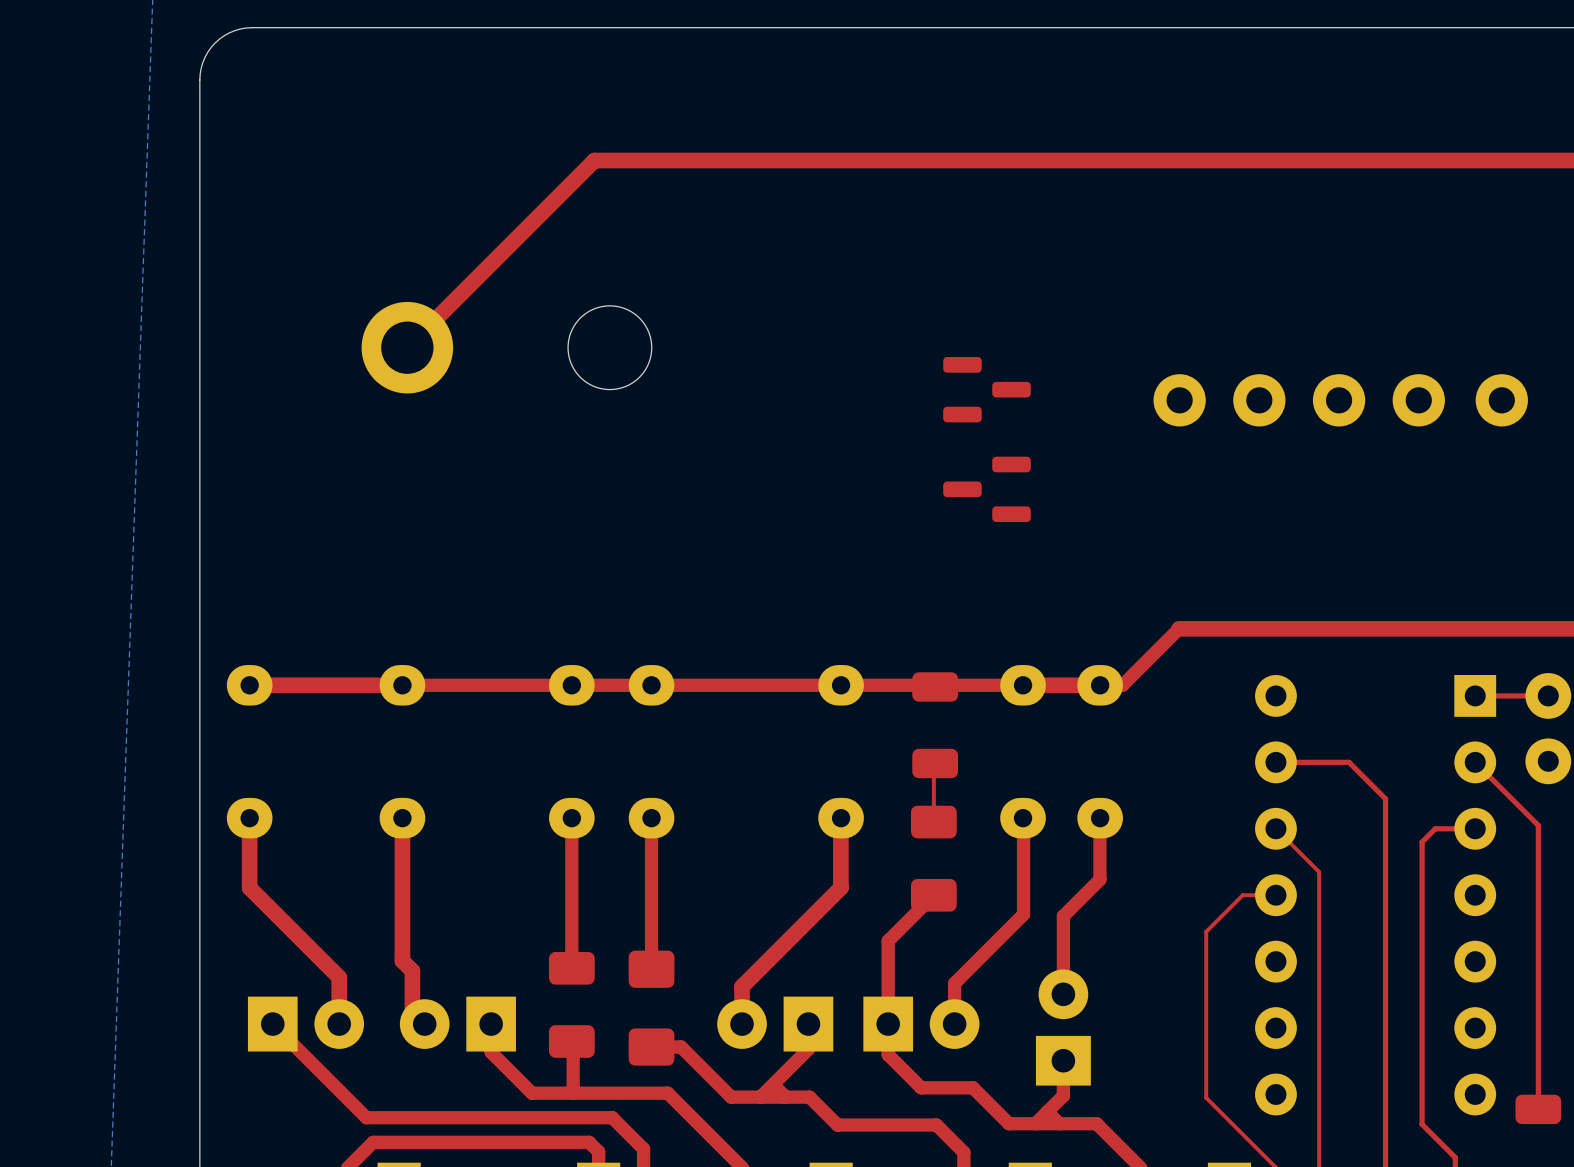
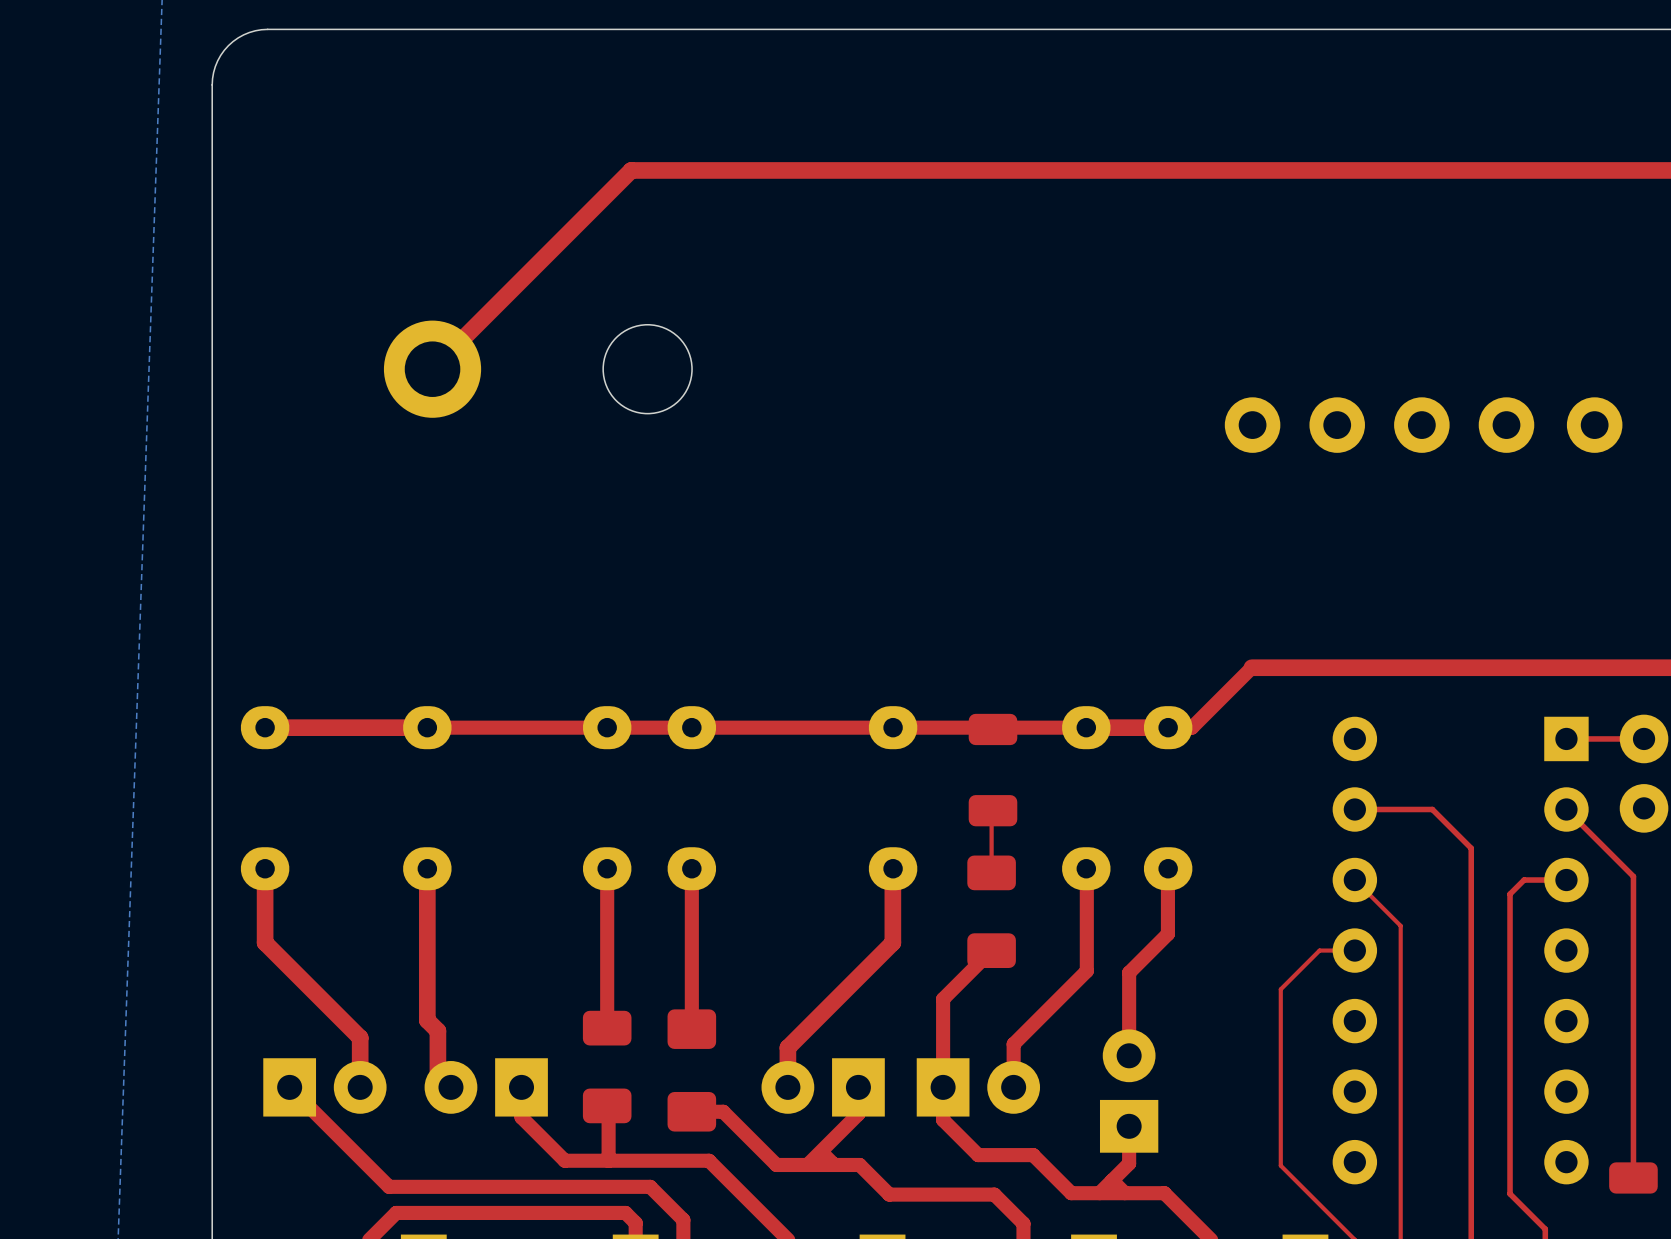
part: (987, 389) -> none
part: (987, 489) -> none

